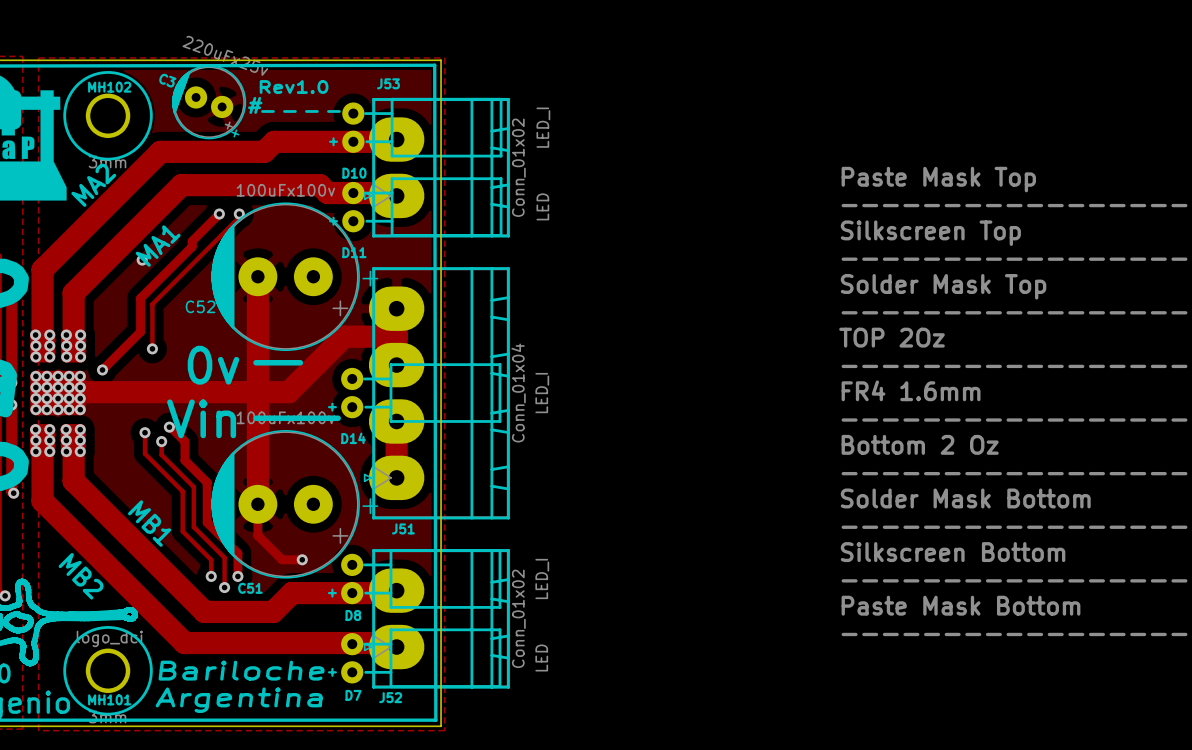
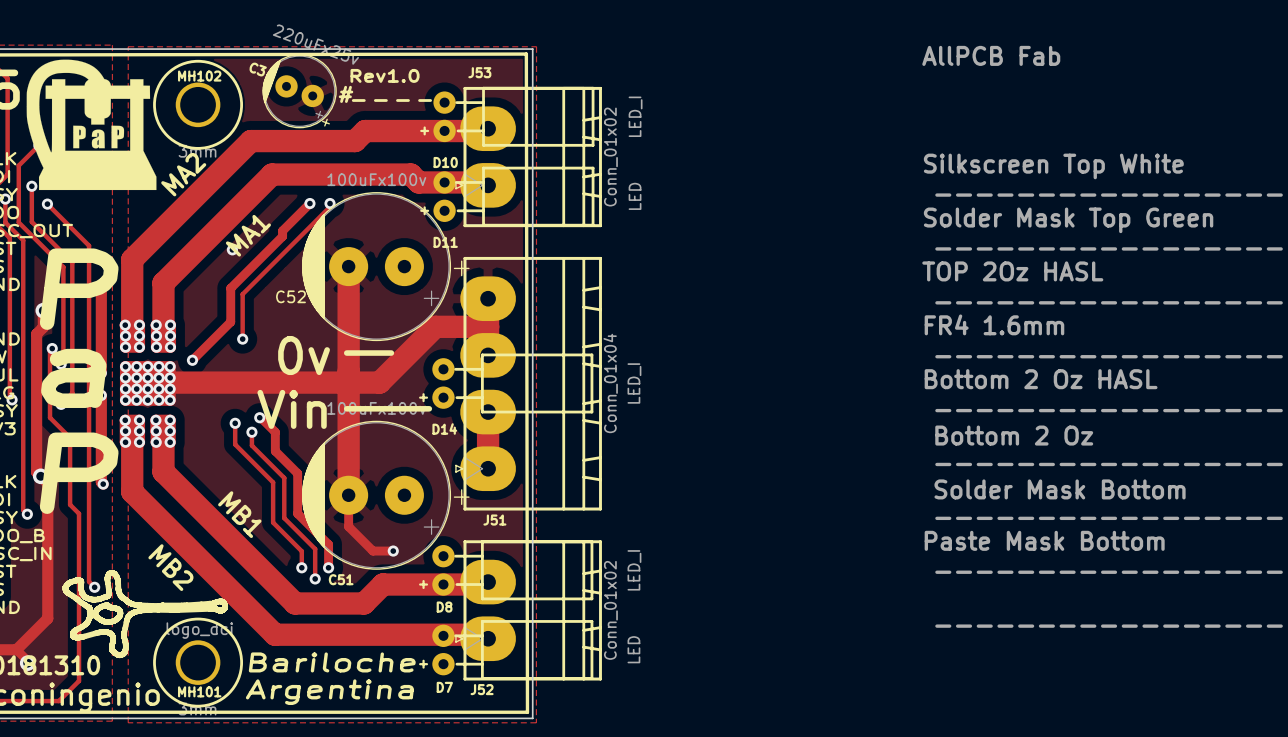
text: none -> AllPCB Fab (991, 55)
text: Paste Mask Top (938, 179) -> Silkscreen Top White (1053, 166)
text: Silkscreen Top (930, 233) -> Solder Mask Top Green (1068, 220)
text: Solder Mask Top (943, 286) -> TOP 2Oz HASL (1012, 271)
text: TOP 2Oz (892, 337) -> none
text: none -> Bottom 2 Oz HASL (1041, 379)
text position: FR4 1.6mm (911, 390) -> FR4 1.6mm (994, 324)
text: Silkscreen Bottom (953, 552) -> none
text position: Paste Mask Bottom (960, 605) -> Paste Mask Bottom (1044, 540)

